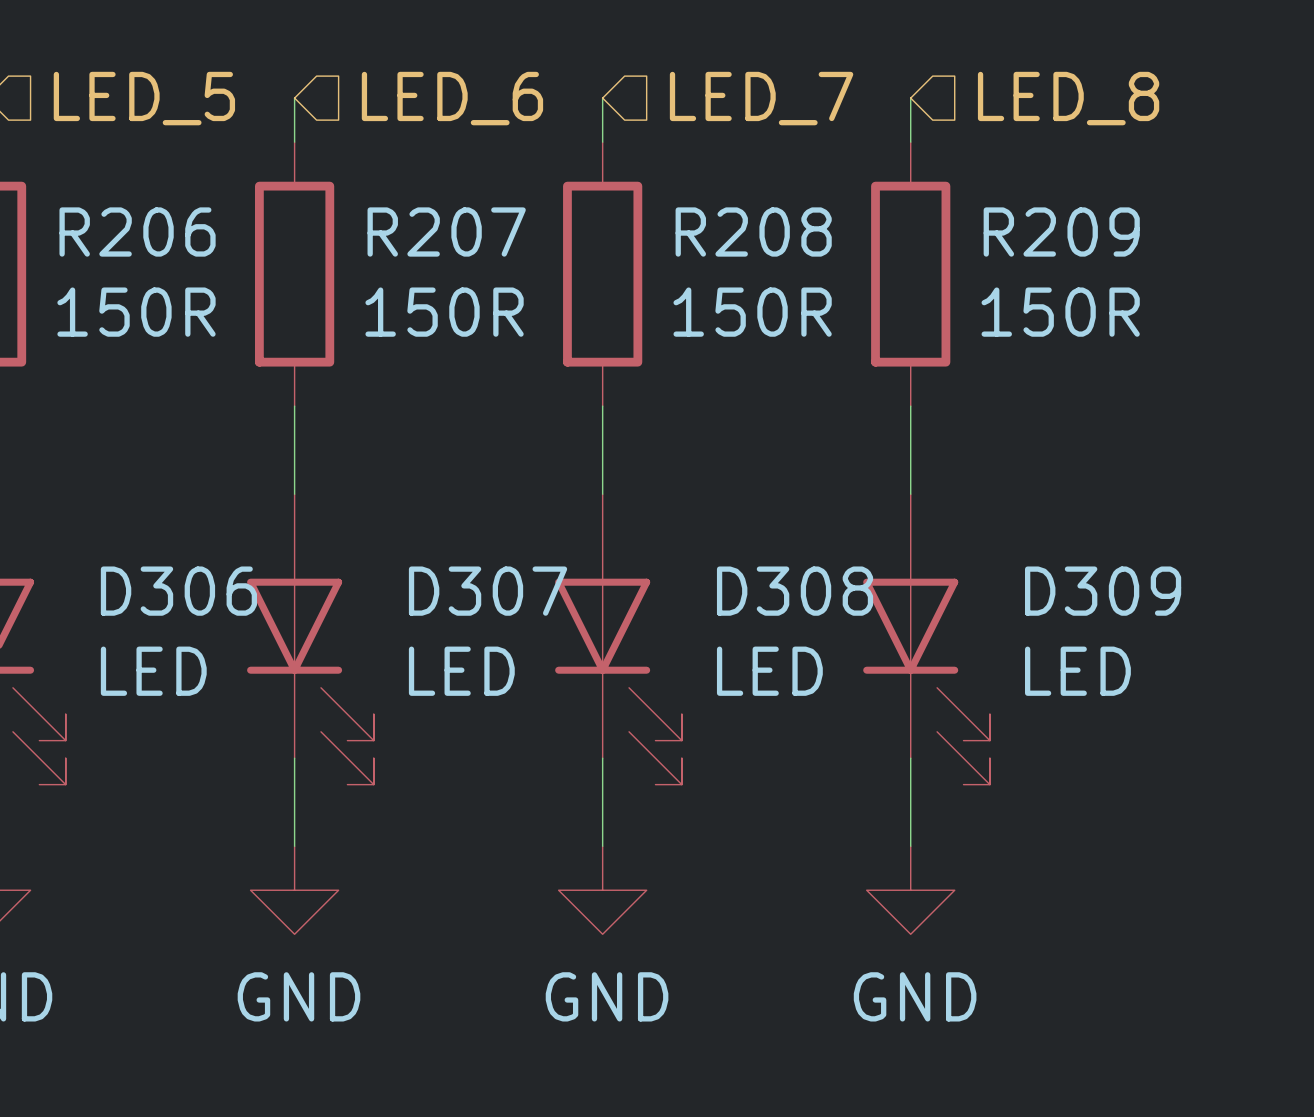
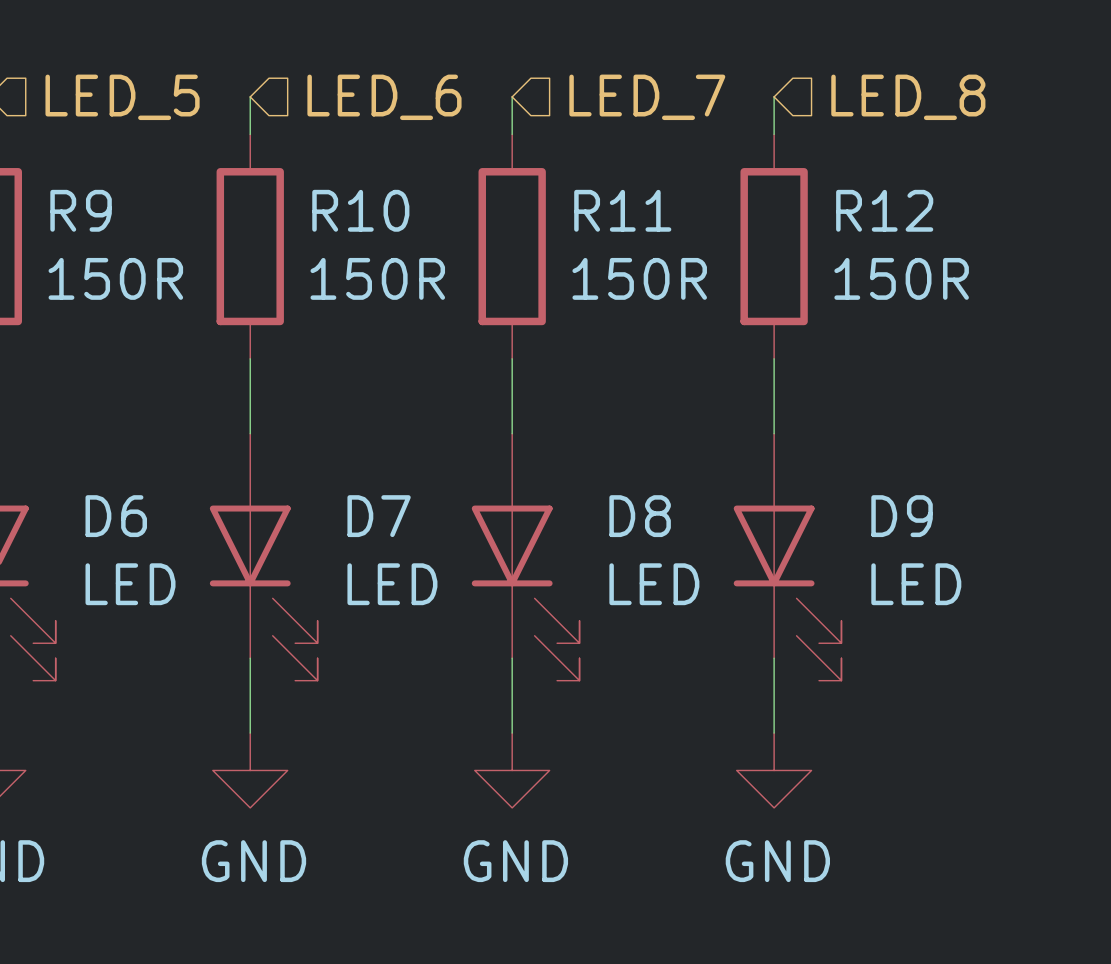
R206 name: R206 (137, 232) -> R9 (81, 210)
R207 name: R207 (446, 232) -> R10 (360, 210)
R208 name: R208 (753, 232) -> R11 (622, 210)
R209 name: R209 (1061, 232) -> R12 (884, 210)
D306 name: D306 (178, 591) -> D6 (116, 516)
D307 name: D307 (488, 591) -> D7 (379, 516)
D308 name: D308 (795, 591) -> D8 (640, 516)
D309 name: D309 (1103, 591) -> D9 (902, 516)

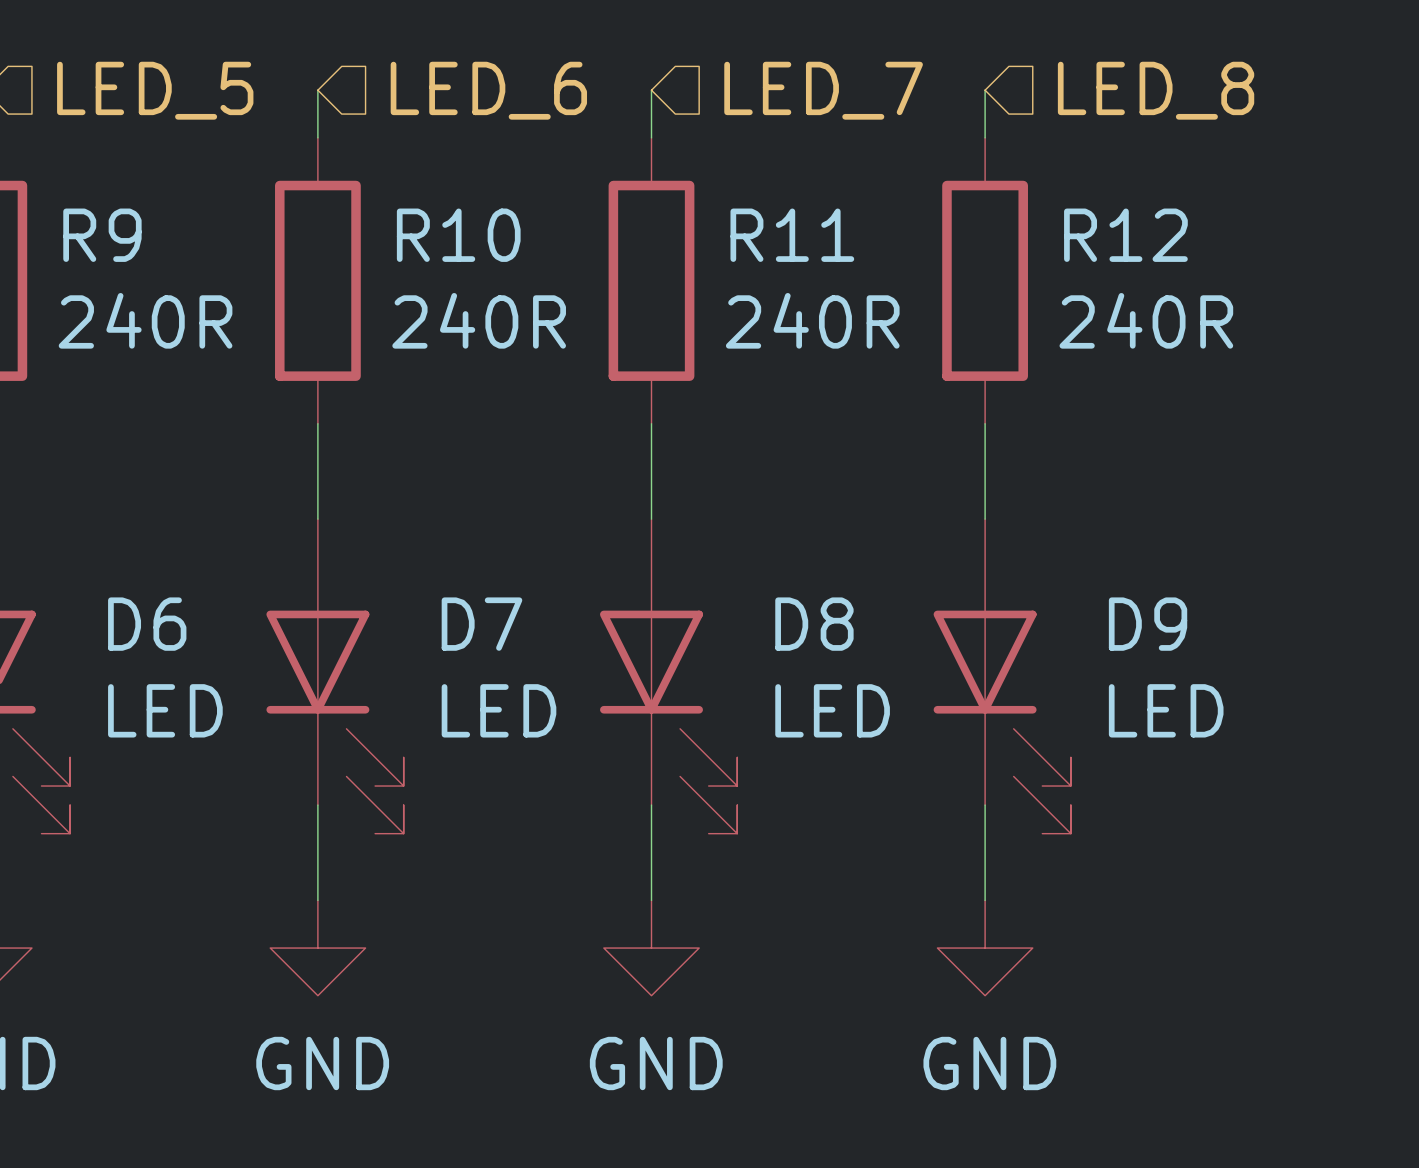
R9 value: 150R (115, 278) -> 240R (145, 320)
R10 value: 150R (377, 278) -> 240R (479, 320)
R11 value: 150R (639, 278) -> 240R (812, 320)
R12 value: 150R (901, 278) -> 240R (1146, 320)

